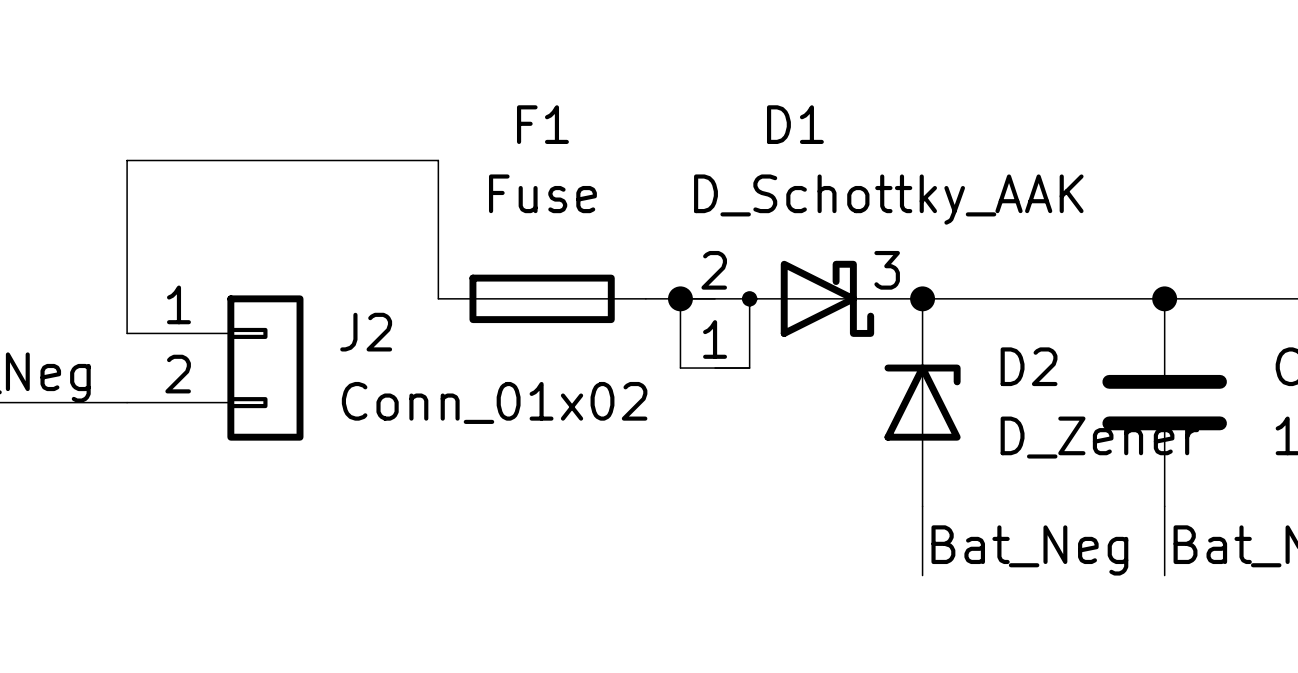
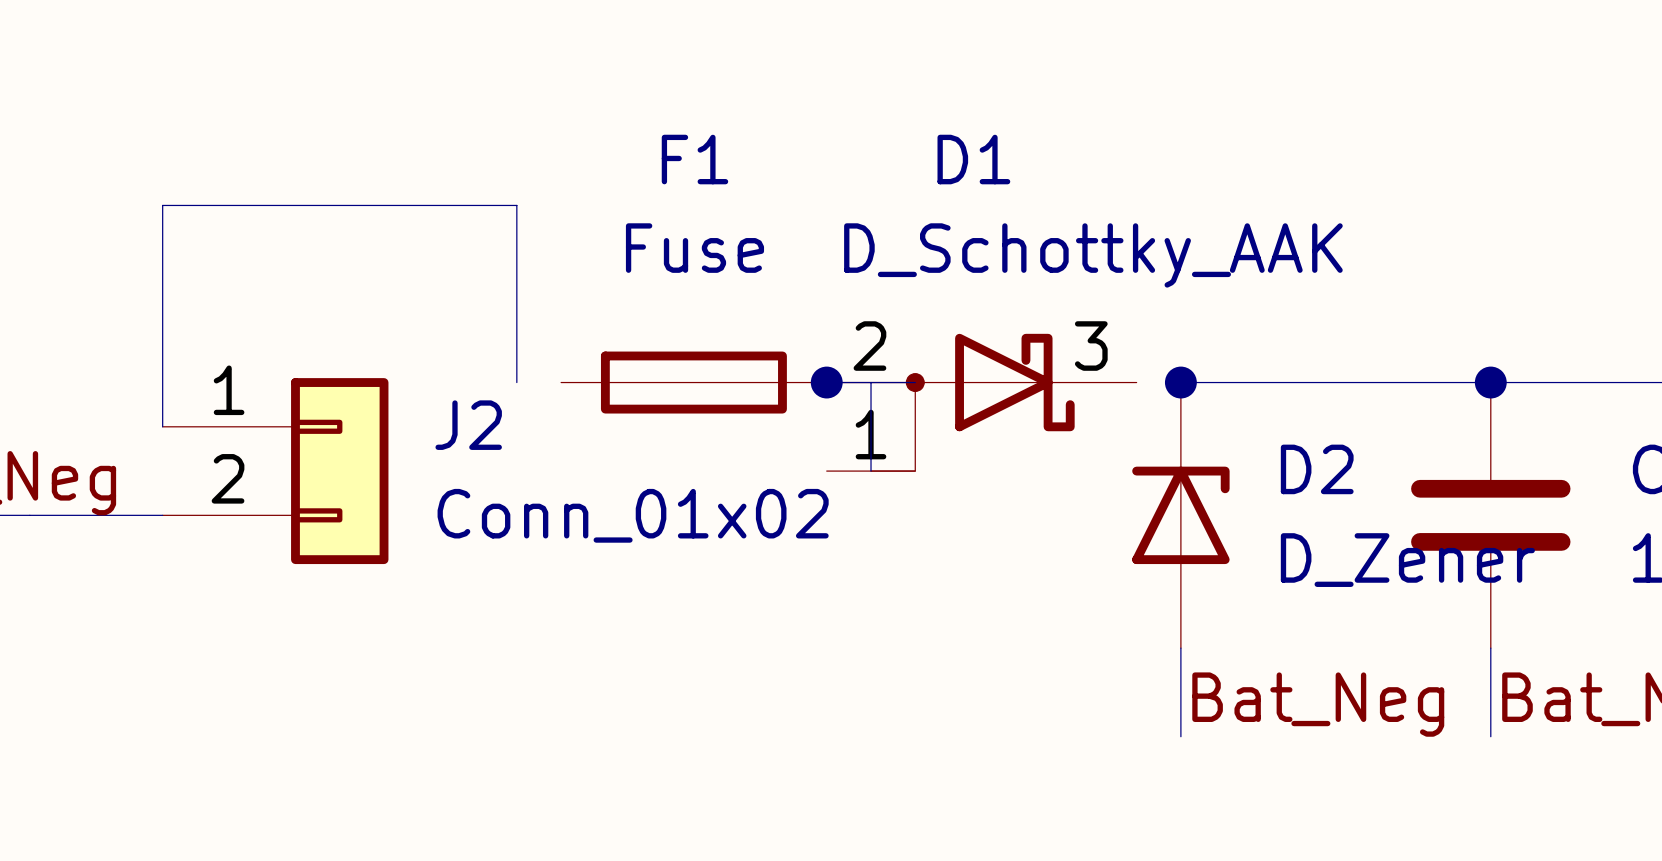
wire: (403, 160) (438, 160) (438, 298) -> (516, 205) (516, 382)
junction position: (680, 298) -> (826, 382)
D1 position: (801, 314) -> (981, 402)

